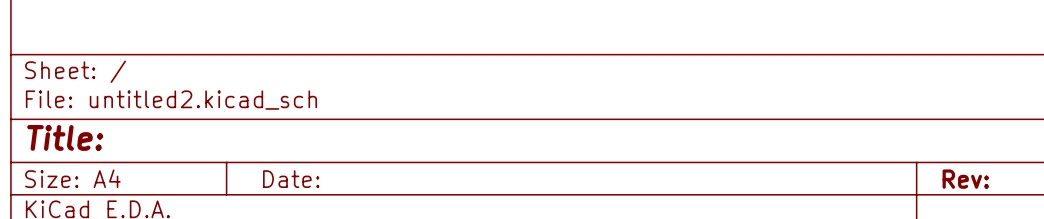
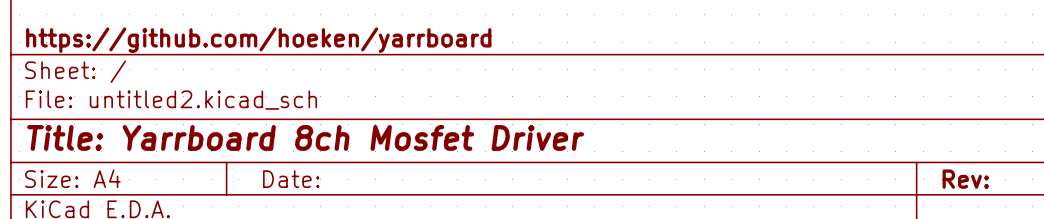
title block: none -> https://github.com/hoeken/yarrboard (258, 40)
title block: Title: (65, 137) -> Title: Yarrboard 8ch Mosfet Driver (305, 137)

